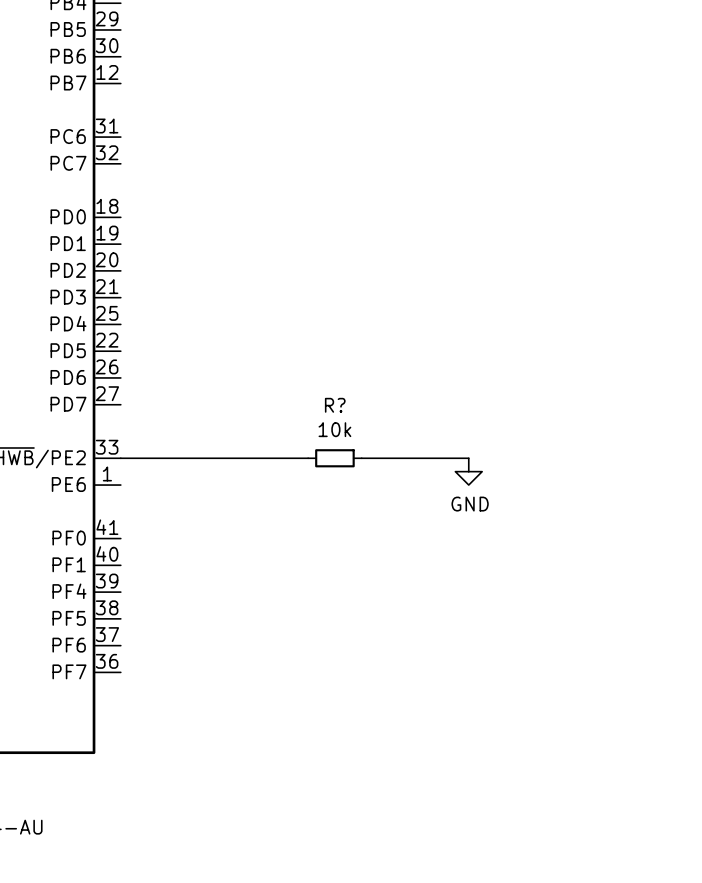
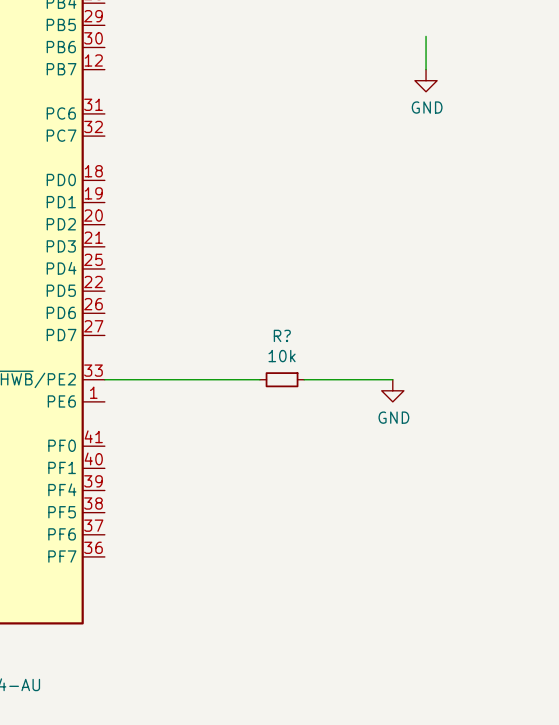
wire: none -> (426, 36) (426, 69)
power symbol: none -> GND (426, 80)

